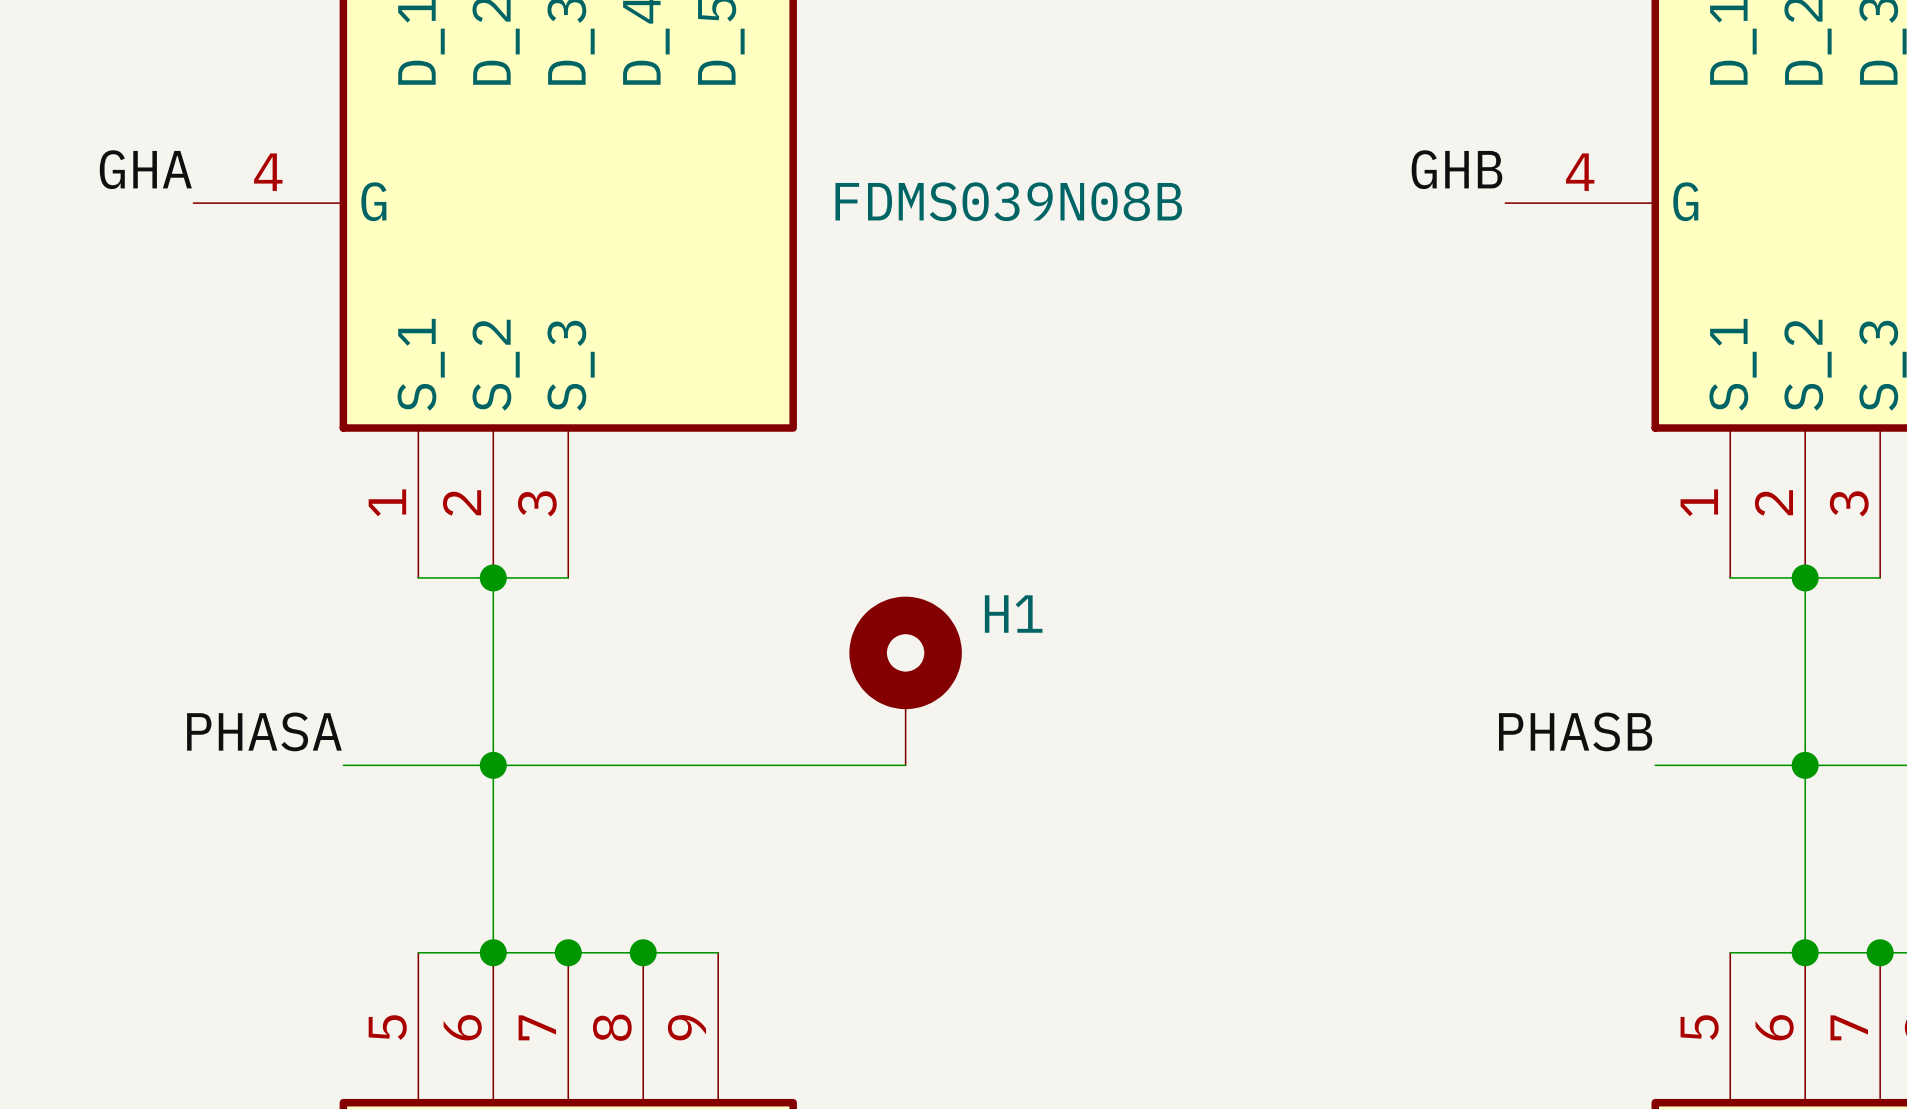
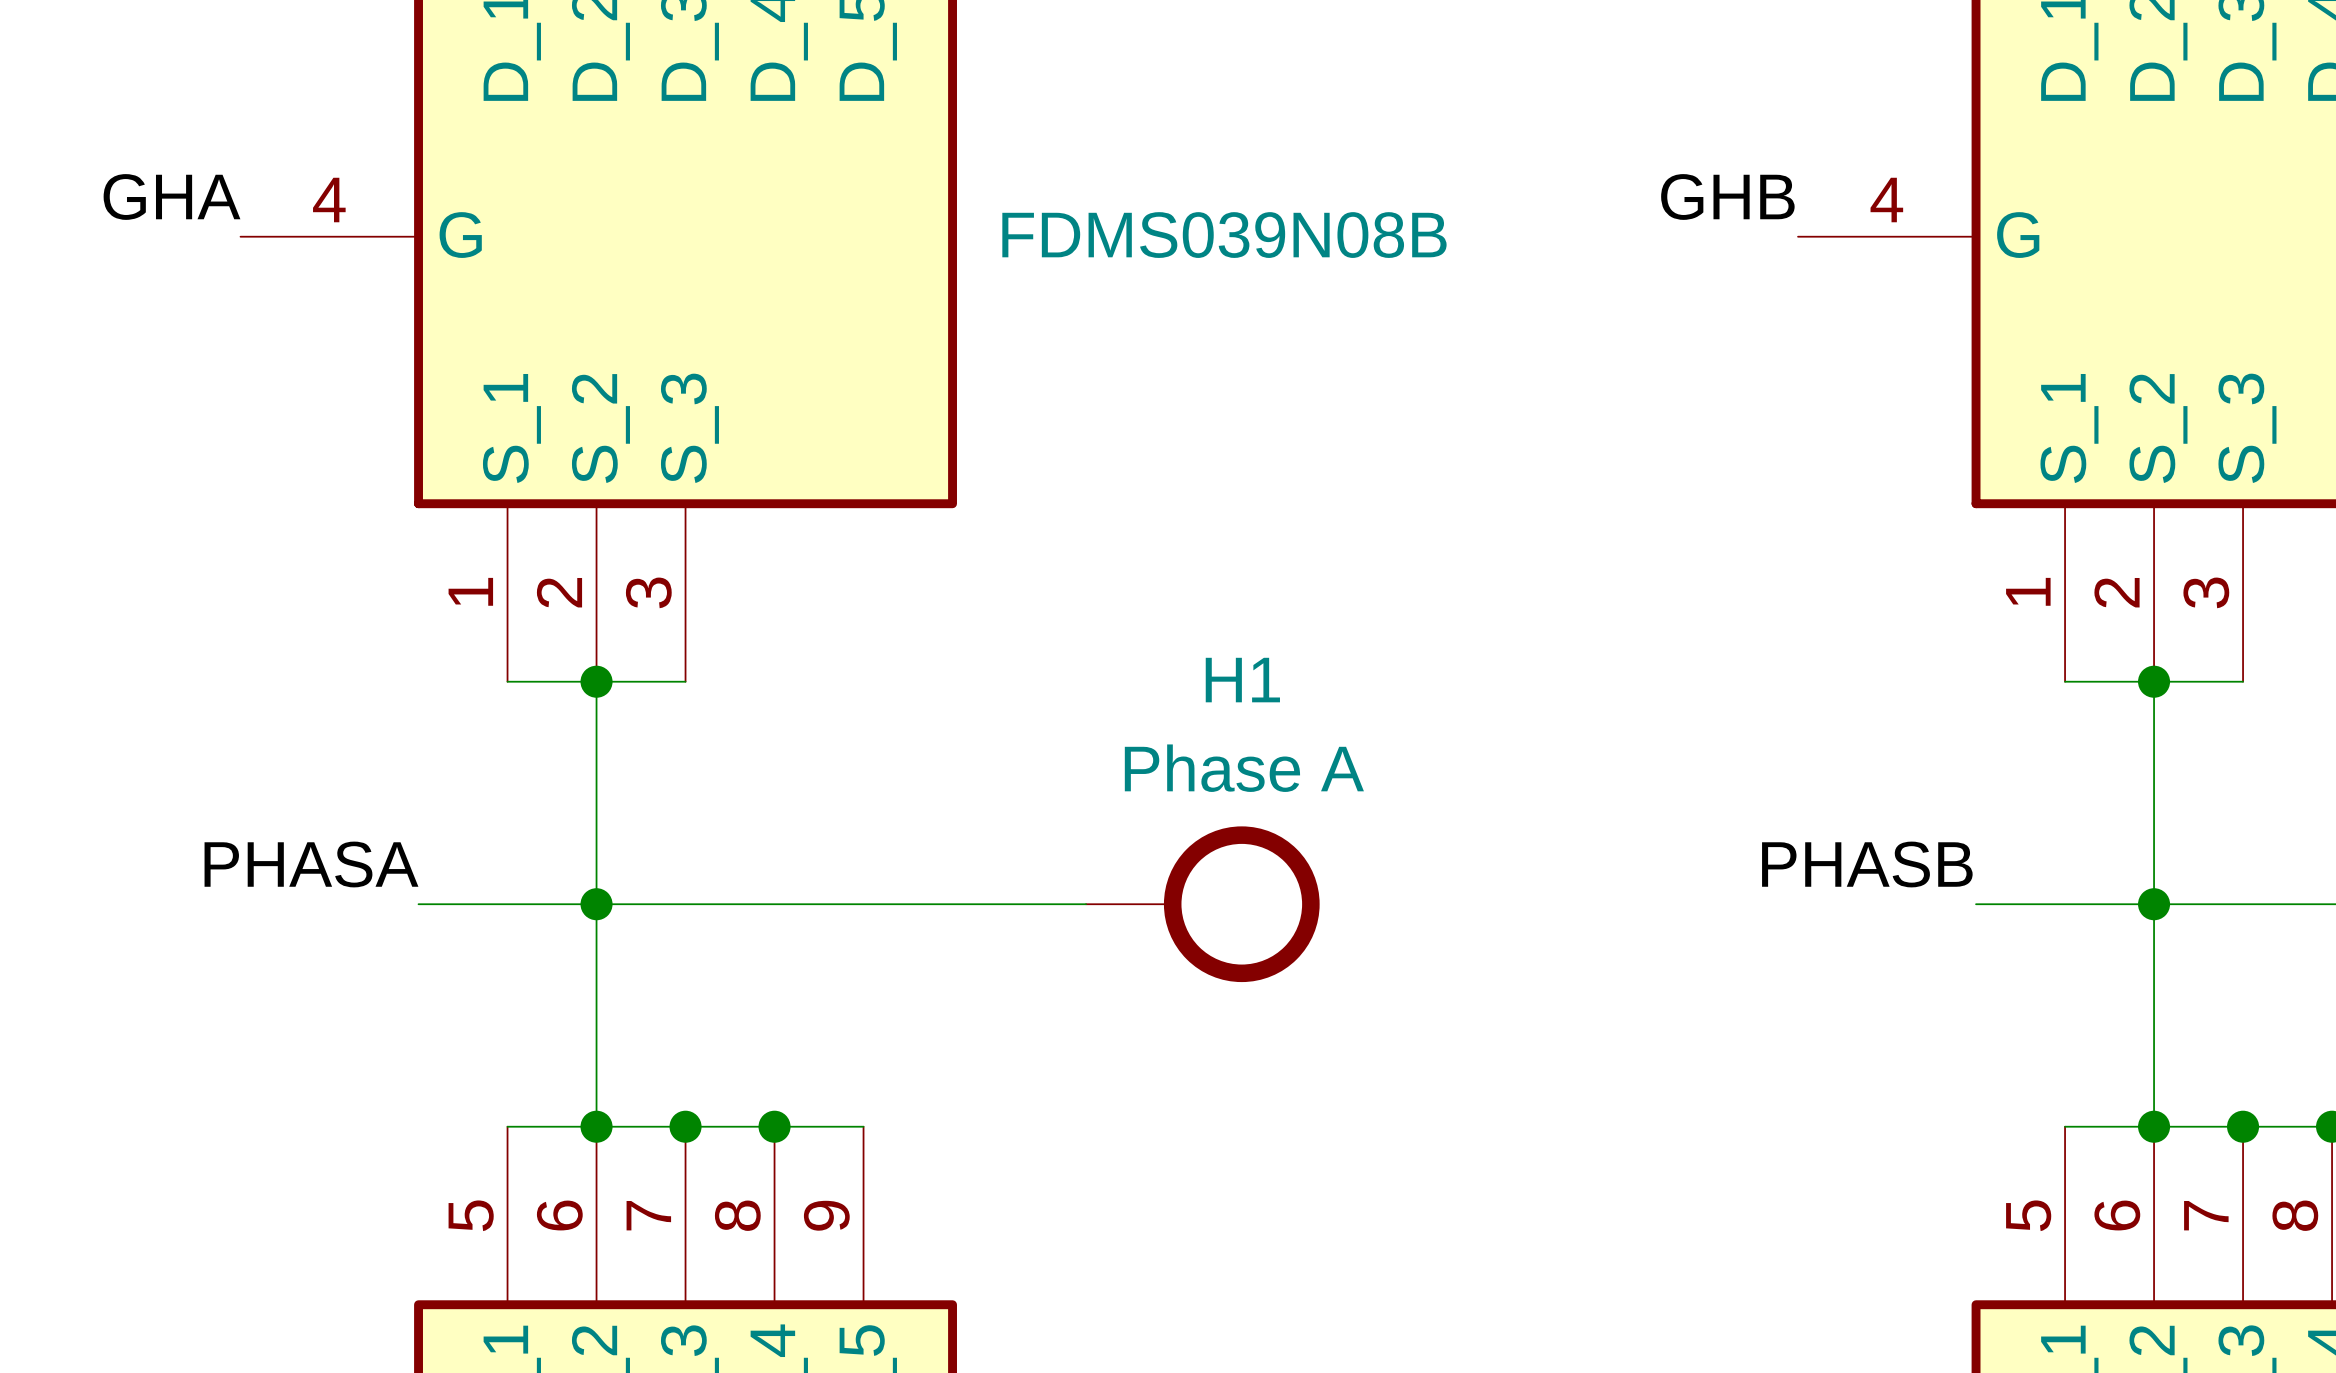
H1 symbol: [849, 596, 962, 766] -> [1086, 826, 1320, 983]
H1 name position: H1 (1013, 614) -> H1 (1242, 680)
H1 value: none -> Phase A (1244, 768)

